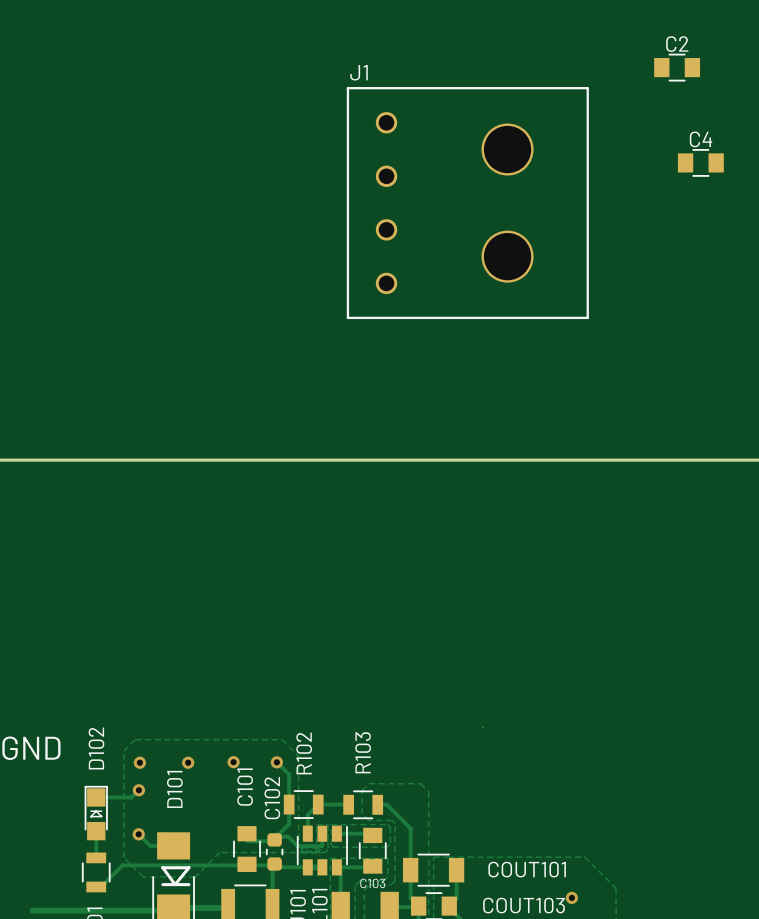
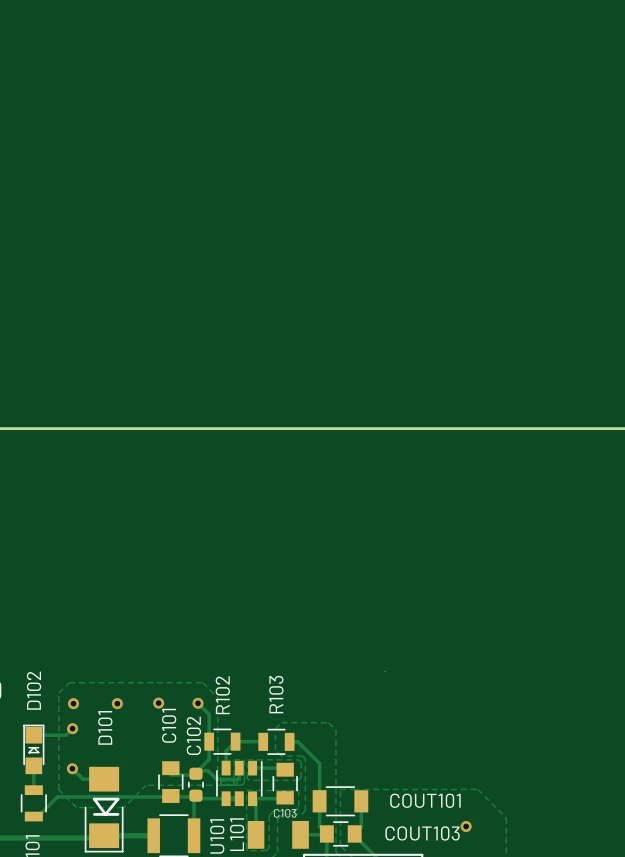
C2: (677, 67) -> none
C4: (700, 162) -> none
J1: (467, 203) -> none

